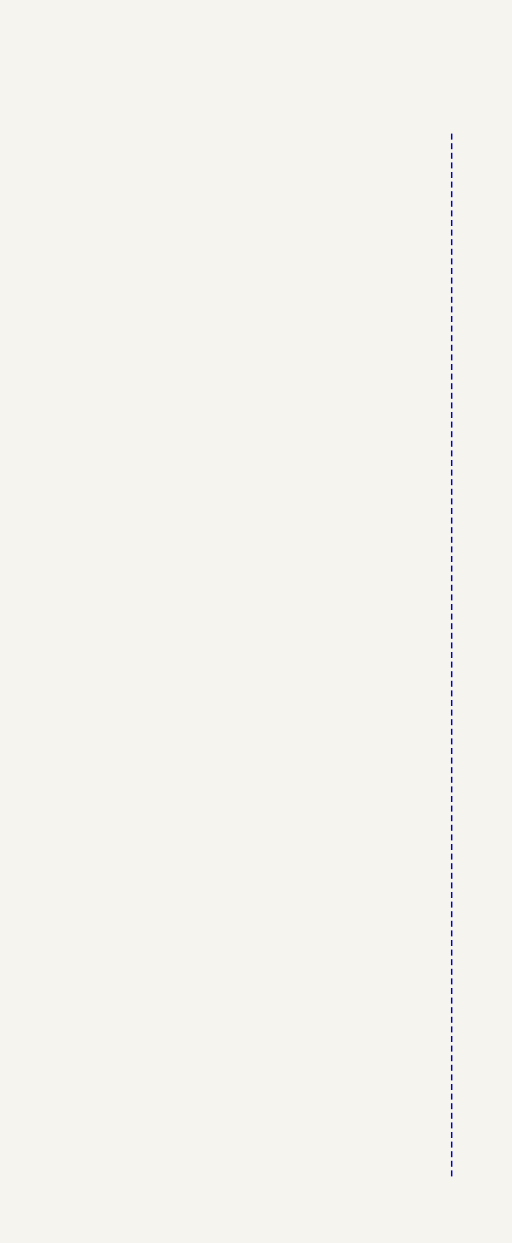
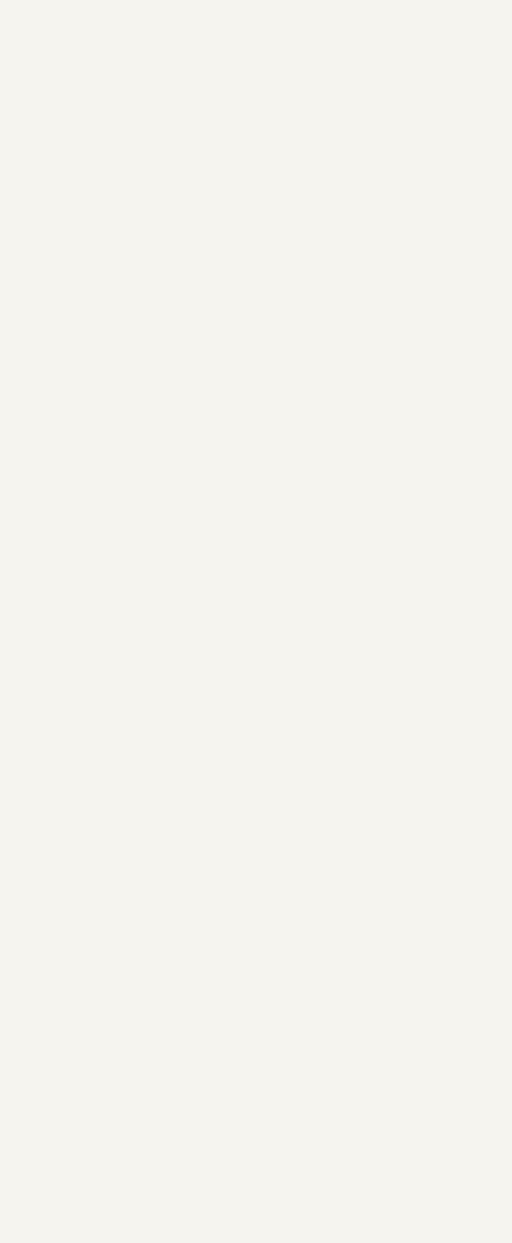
line: (451, 133) (451, 1176) -> none

